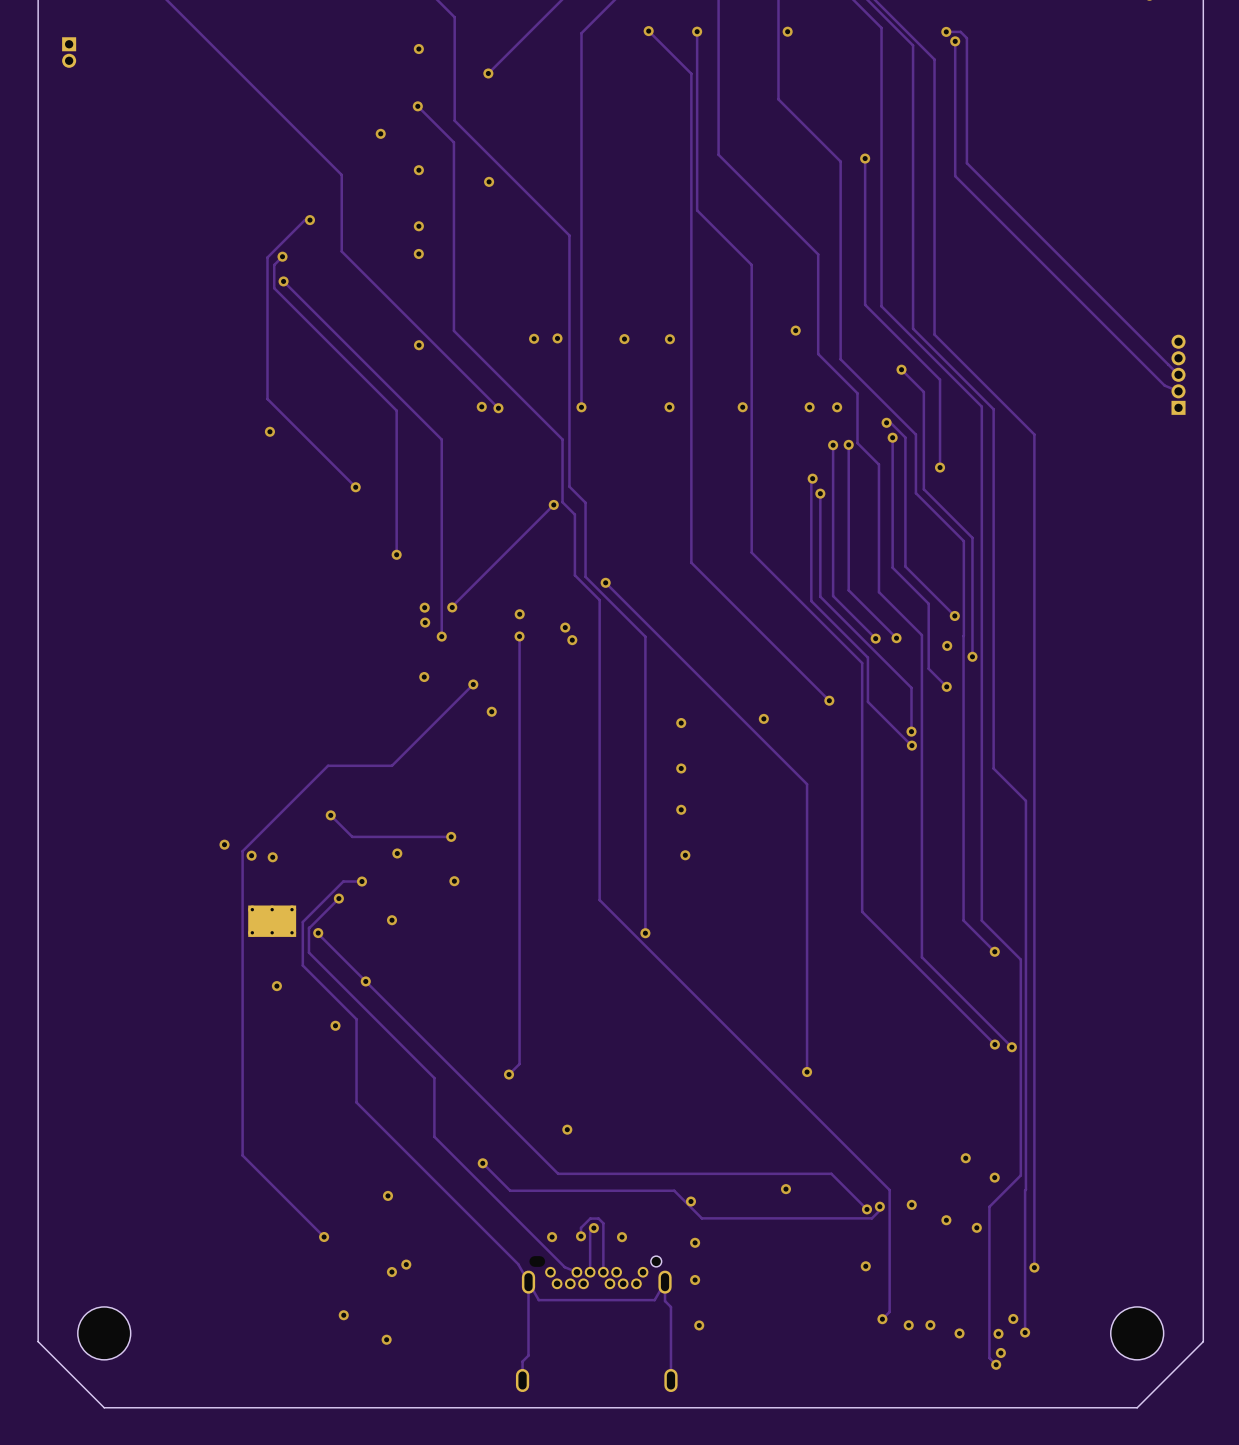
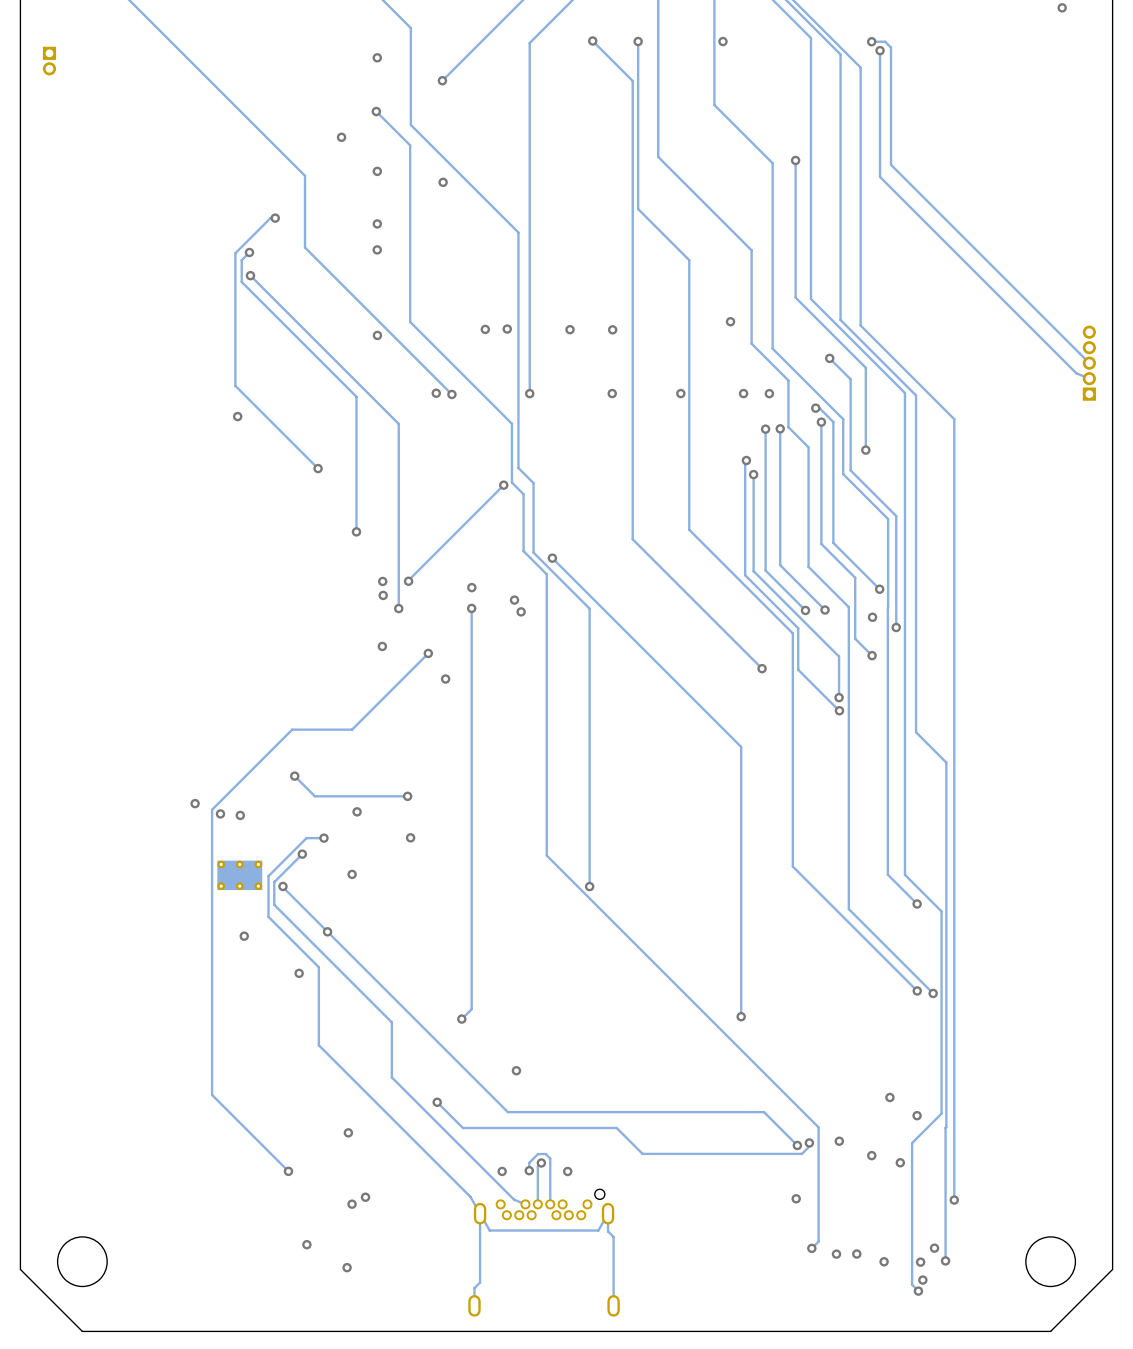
via: (763, 718) -> none
via: (681, 723) -> none
via: (681, 768) -> none
via: (681, 809) -> none
via: (685, 855) -> none
via: (786, 1189) -> none
via: (690, 1201) -> none
via: (695, 1242) -> none
via: (695, 1280) -> none
via: (699, 1325) -> none

